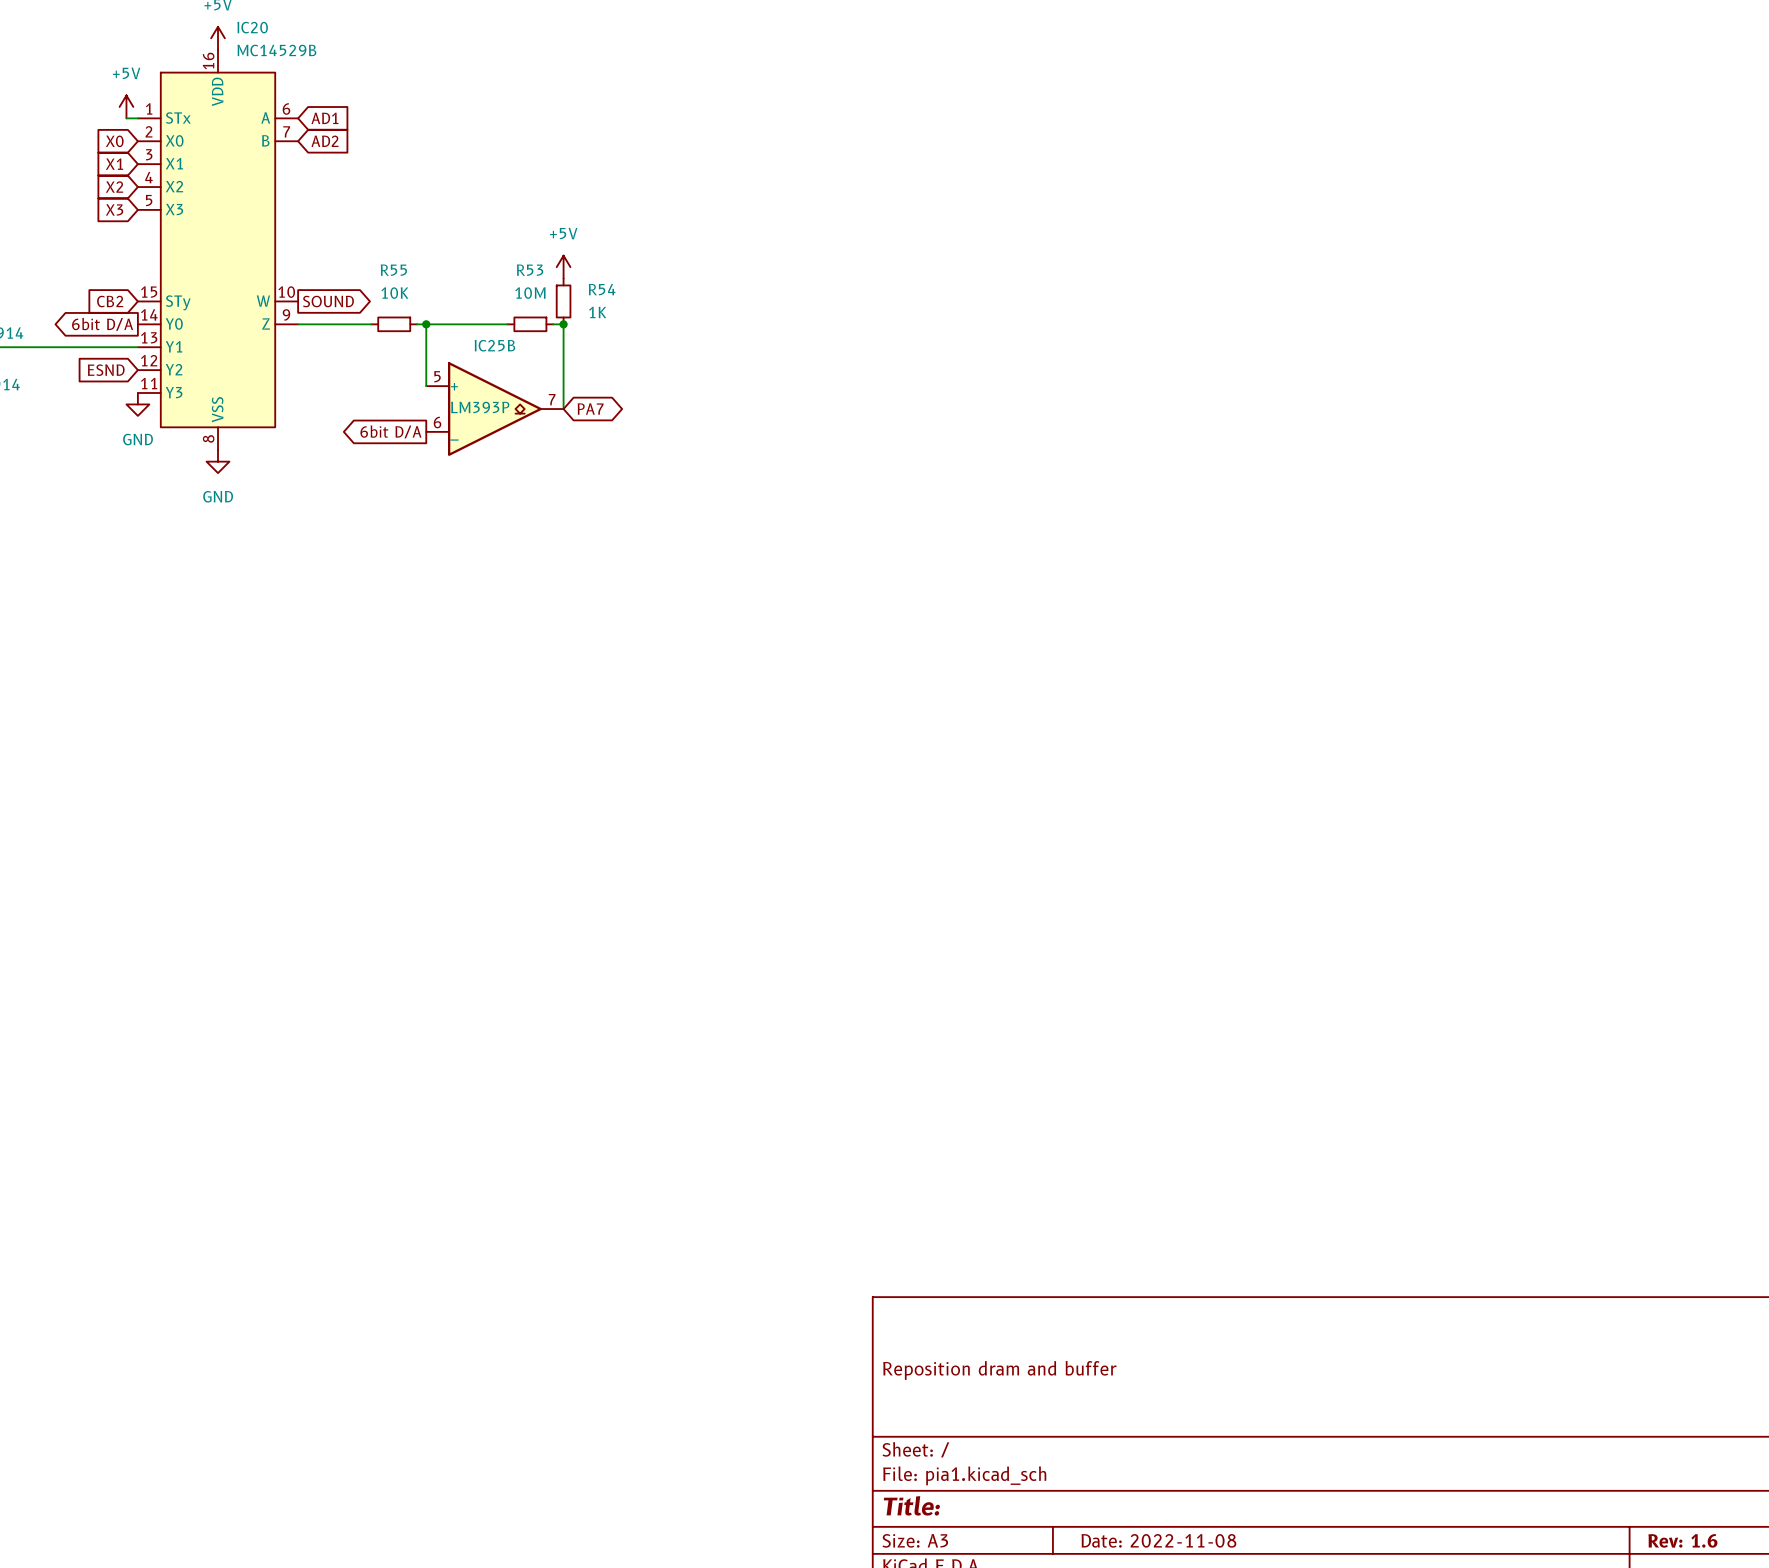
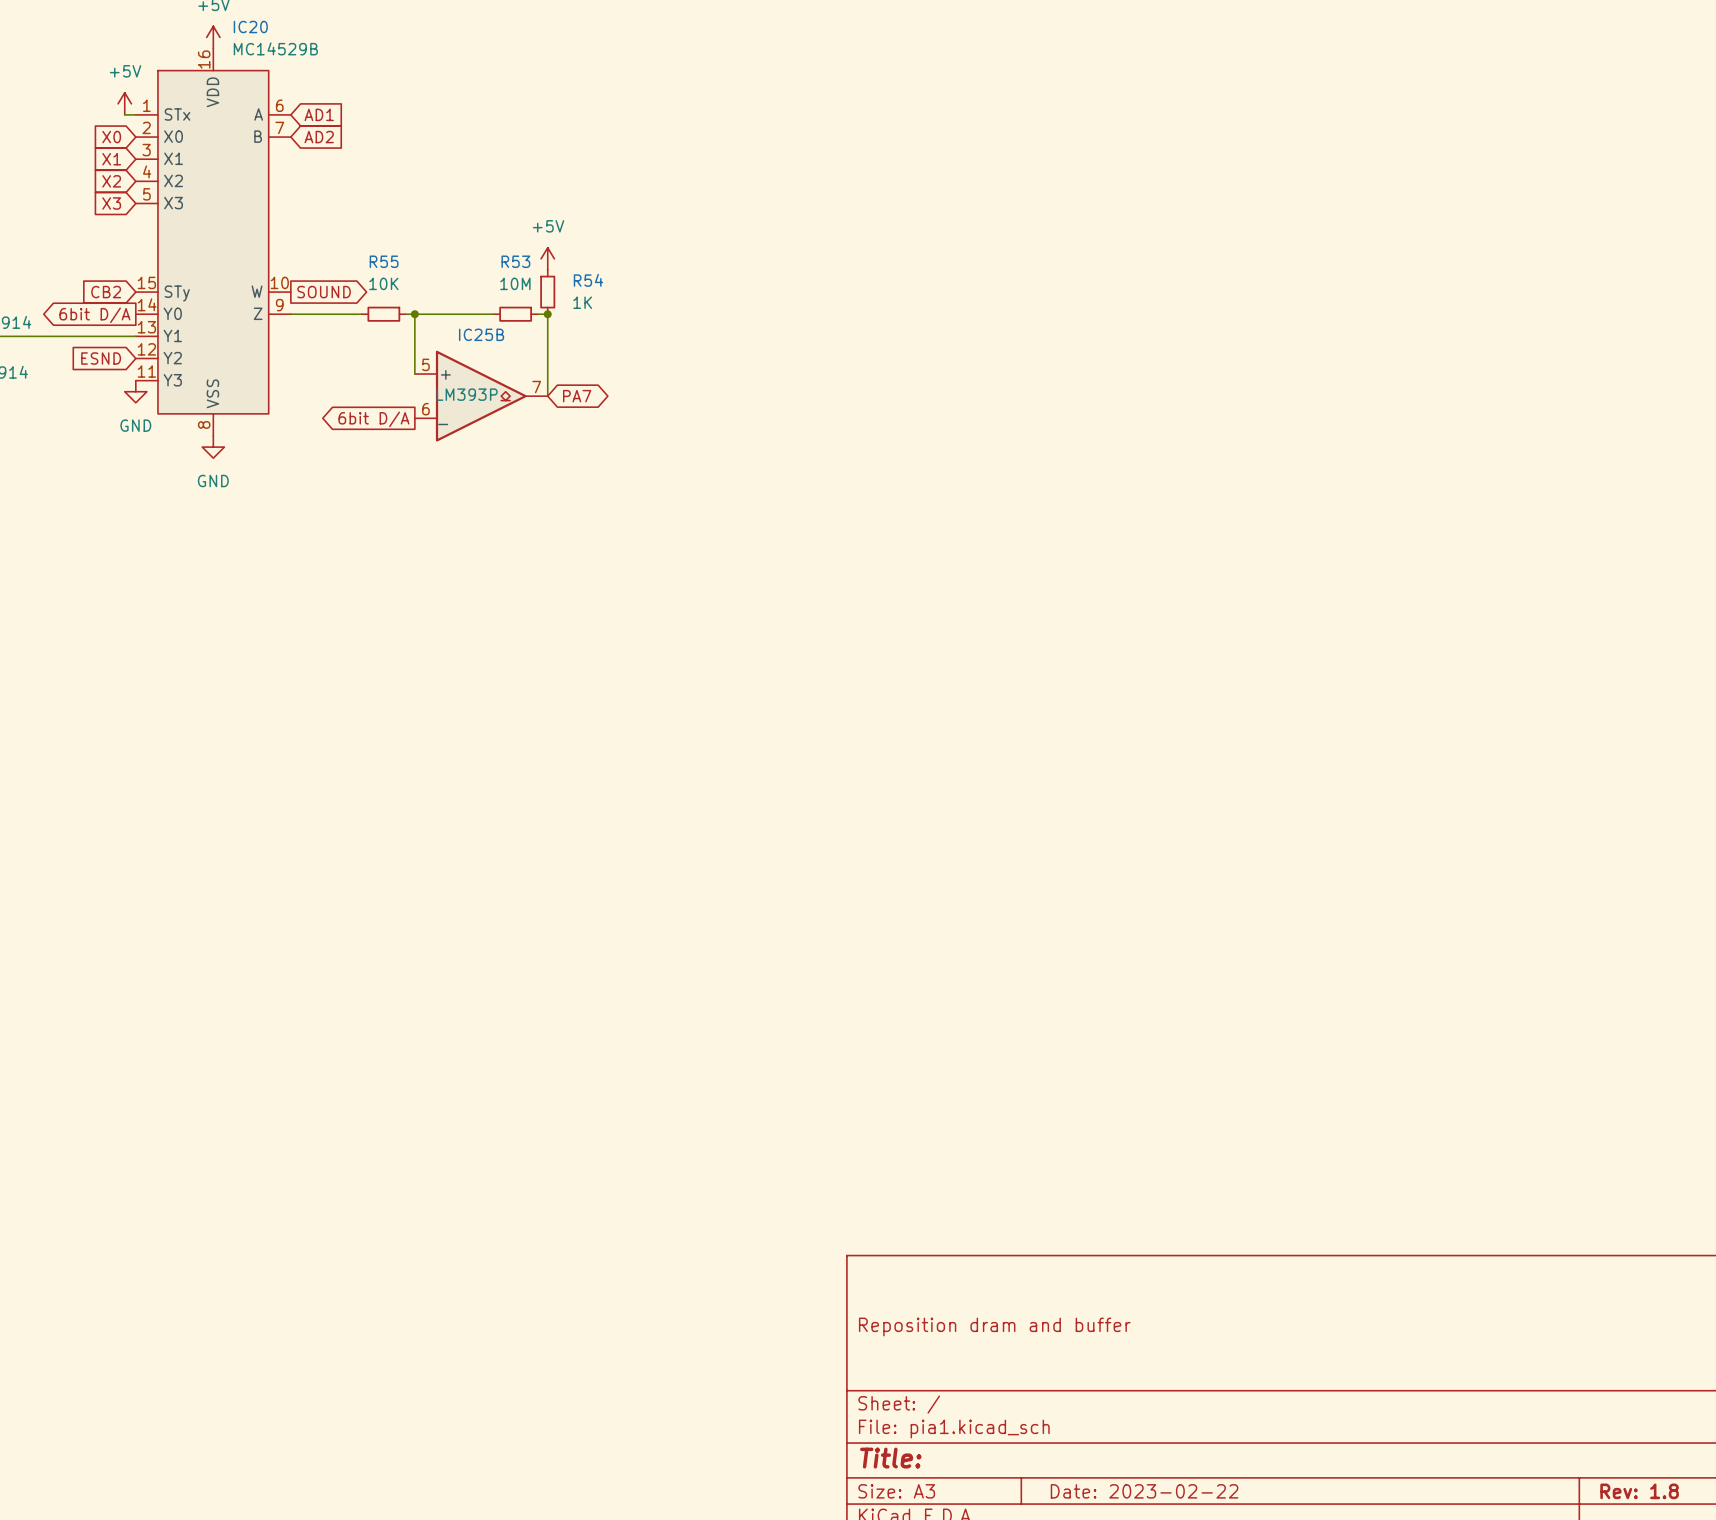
title block: Date: 2022-11-08 (1158, 1540) -> Date: 2023-02-22 (1144, 1491)
title block: Rev: 1.6 (1682, 1540) -> Rev: 1.8 (1639, 1491)

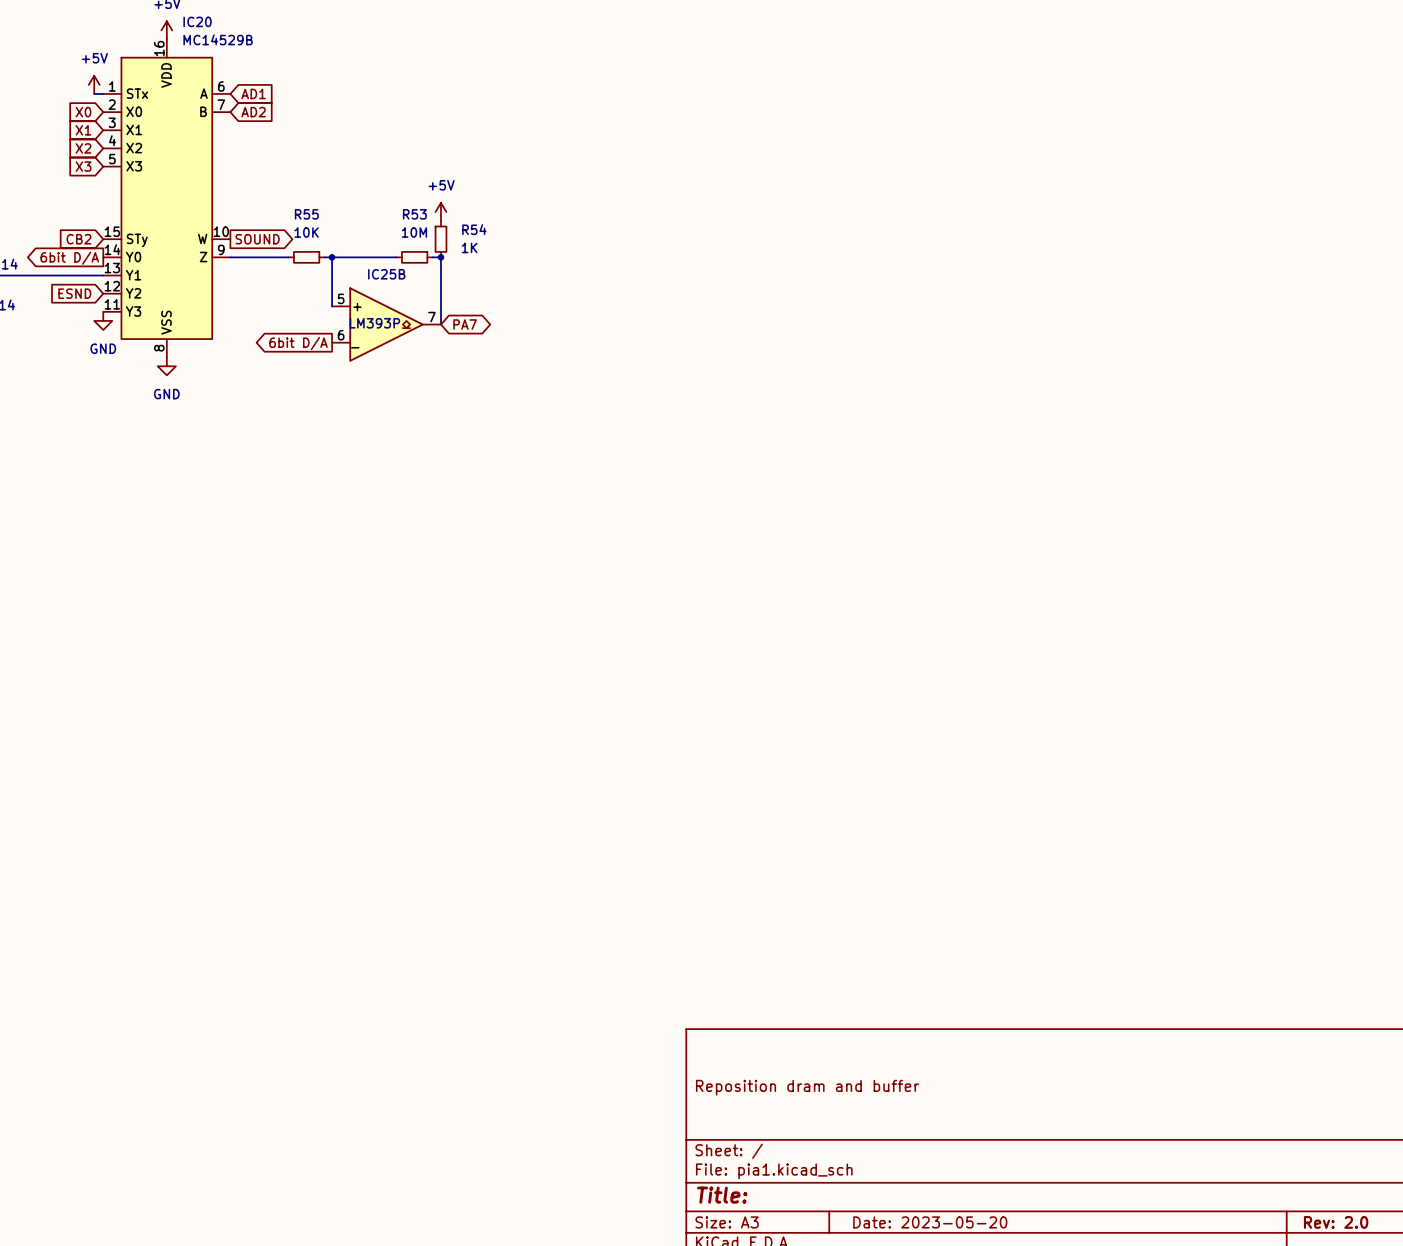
title block: Date: 2023-02-22 (1144, 1491) -> Date: 2023-05-20 (930, 1222)
title block: Rev: 1.8 (1639, 1491) -> Rev: 2.0 (1336, 1222)

